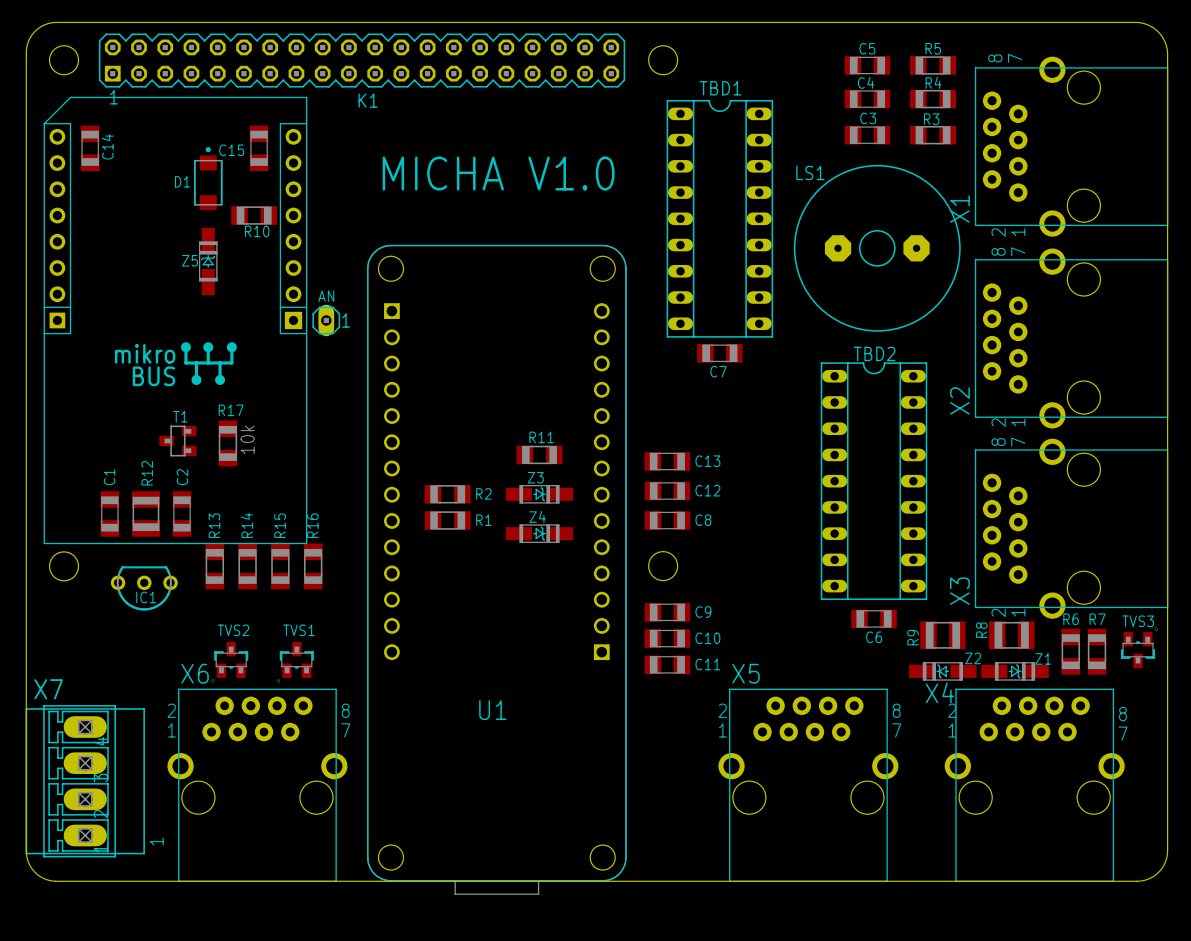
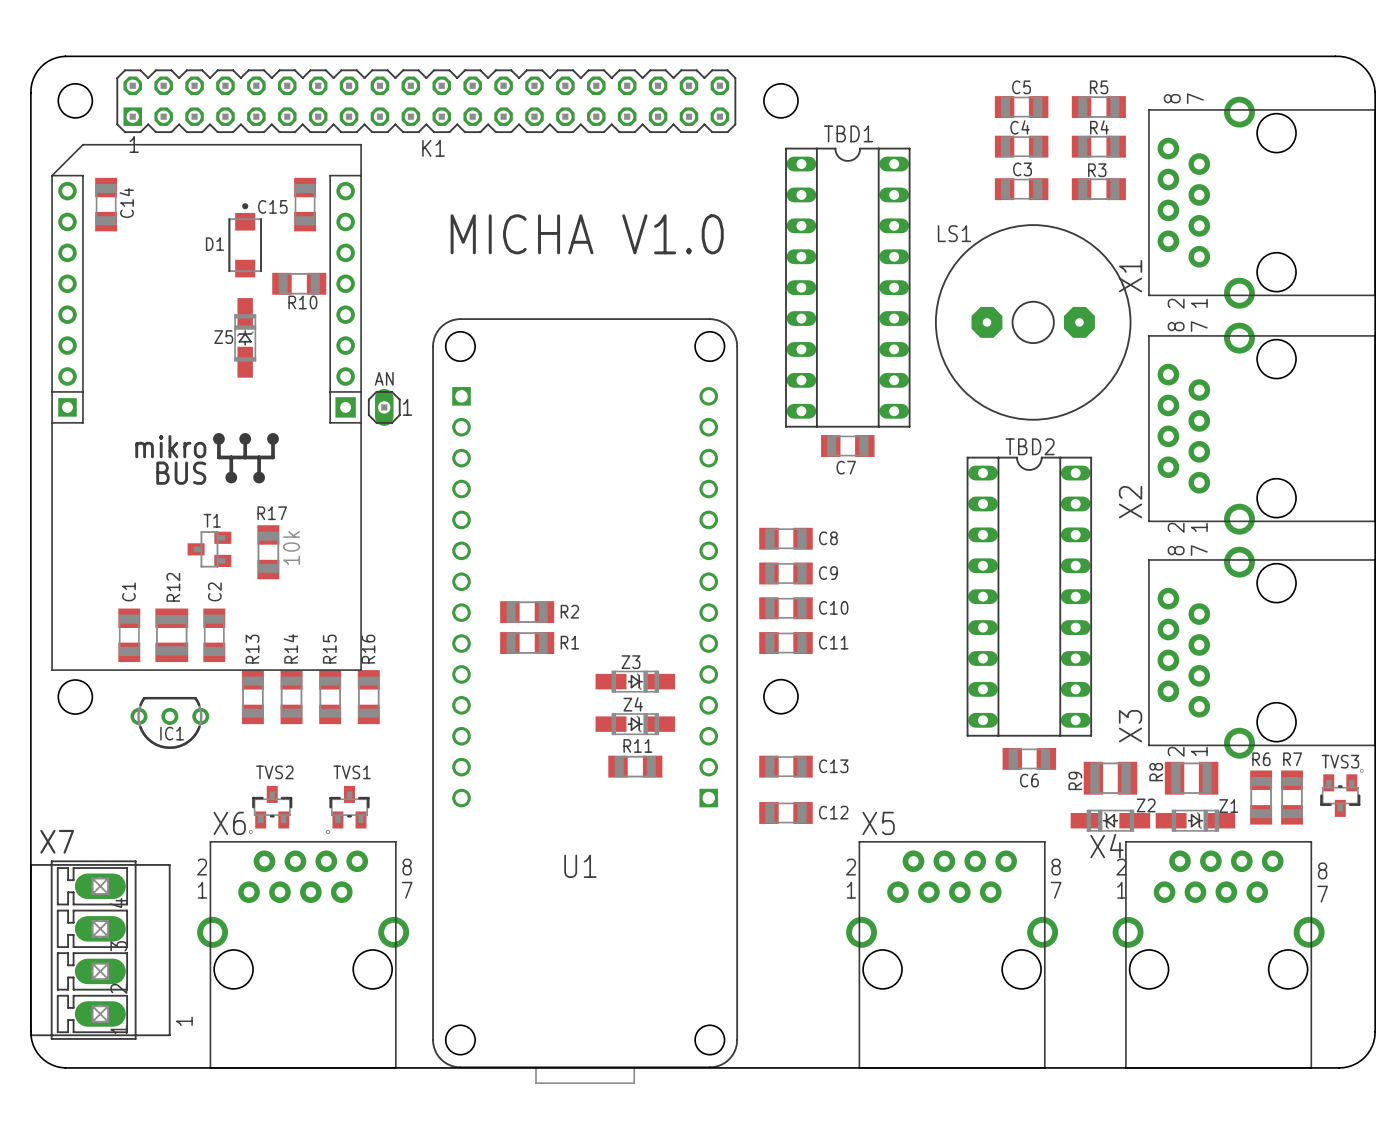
C8: none -> (785, 538)
R11 position: (539, 454) -> (635, 766)
C13 name: C13 (707, 461) -> C9 (828, 573)
C12 name: C12 (707, 490) -> C10 (833, 607)
Z3 position: (539, 494) -> (635, 681)
C8 name: C8 (703, 520) -> C11 (833, 642)
Z4 position: (539, 533) -> (635, 724)
C9: (667, 612) -> none
C13: none -> (785, 766)
C10: (667, 638) -> none
C11 name: C11 (707, 664) -> C12 (833, 812)

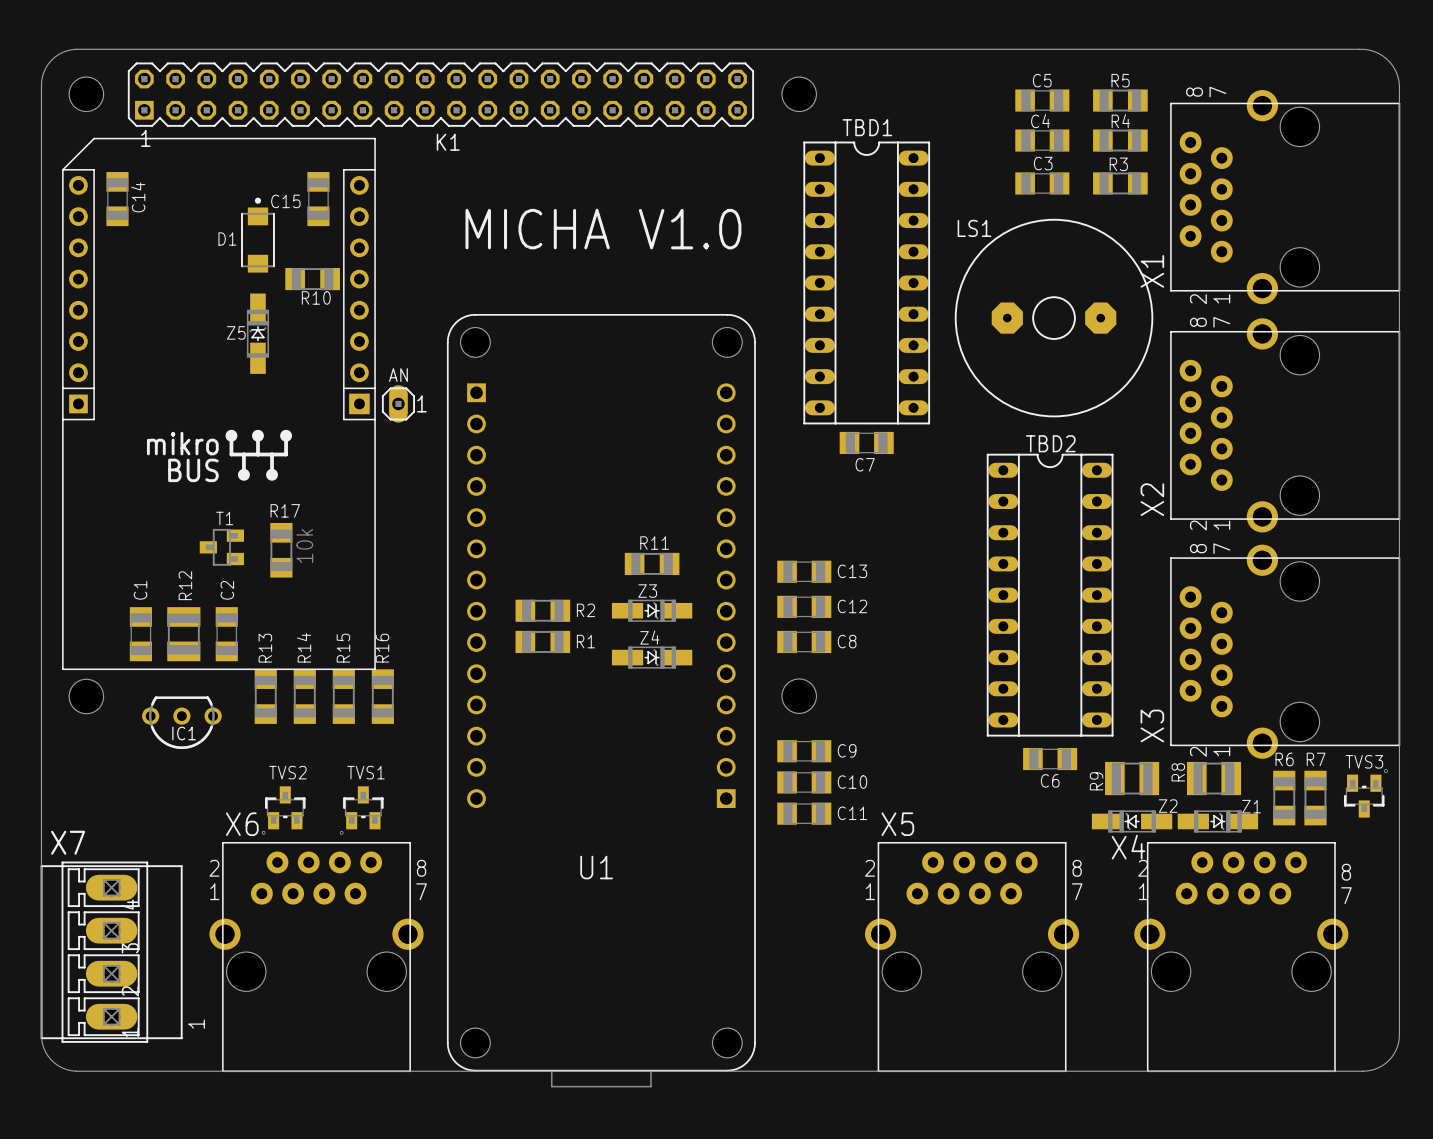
C8: (785, 538) -> none
C9 name: C9 (828, 573) -> C13 (852, 571)
C10 name: C10 (833, 607) -> C12 (852, 606)
C11 name: C11 (833, 642) -> C8 (847, 641)
Z3 position: (635, 681) -> (652, 610)
Z4 position: (635, 724) -> (652, 657)
C9: none -> (804, 751)
R11 position: (635, 766) -> (652, 563)
C13: (785, 766) -> none
C10: none -> (804, 782)
C12 name: C12 (833, 812) -> C11 (852, 813)

